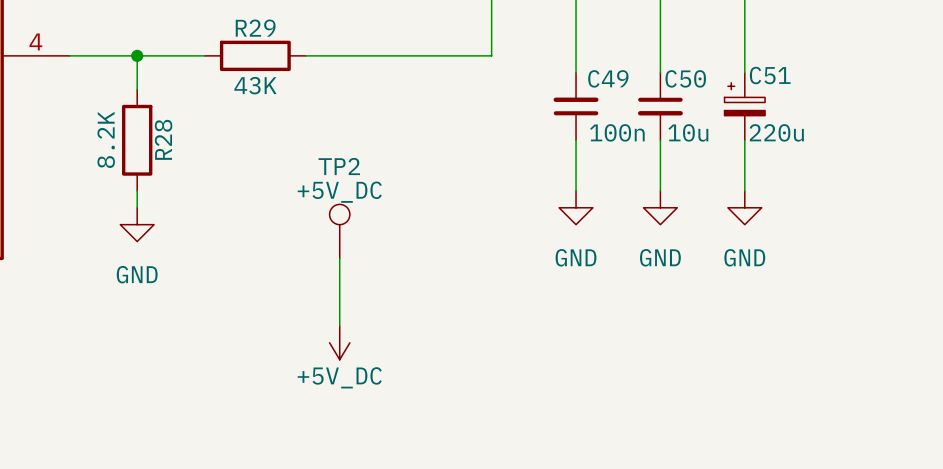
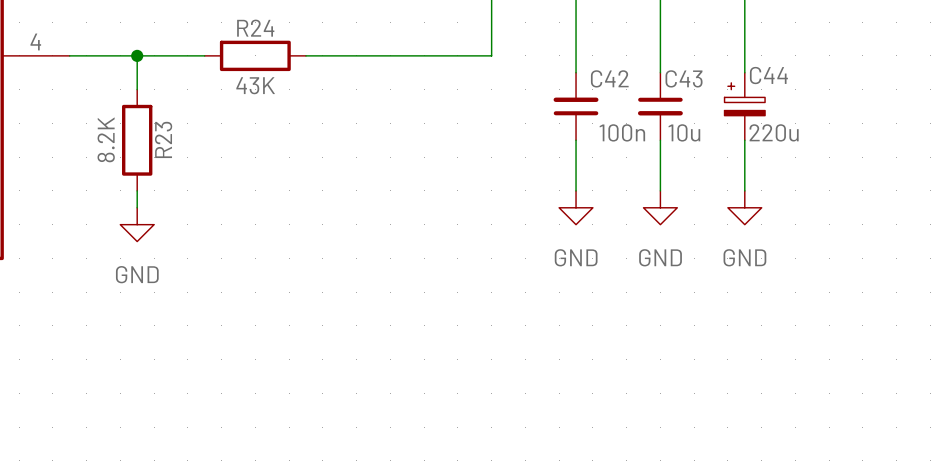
R29 name: R29 (255, 28) -> R24 (255, 28)
C51 name: C51 (770, 75) -> C44 (768, 75)
C49 name: C49 (608, 78) -> C42 (609, 78)
C50 name: C50 (685, 78) -> C43 (684, 78)
R28 name: R28 (163, 139) -> R23 (163, 139)
TP2: +5V_DC (339, 231) -> none
wire: (339, 258) (339, 325) -> none
power symbol: +5V_DC (339, 342) -> none

